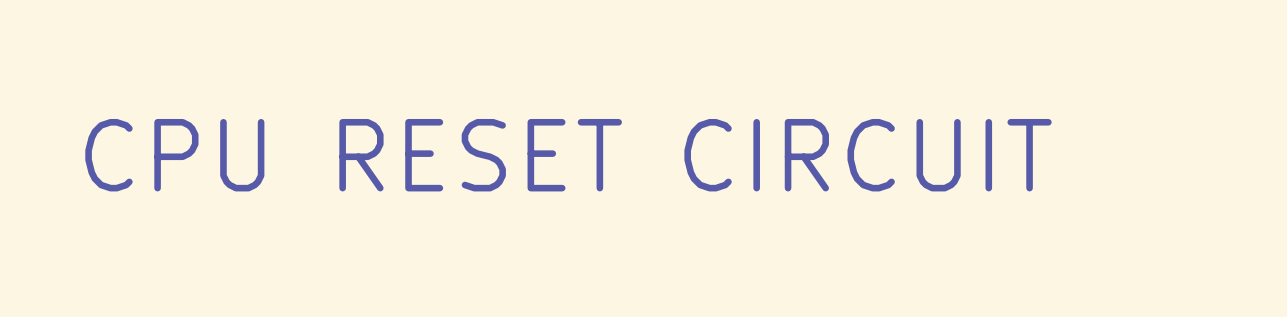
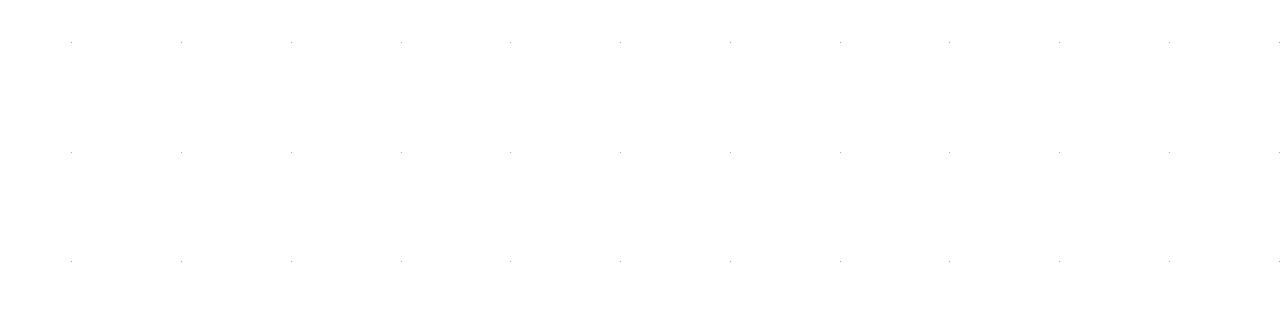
text: CPU RESET CIRCUIT (568, 155) -> none

